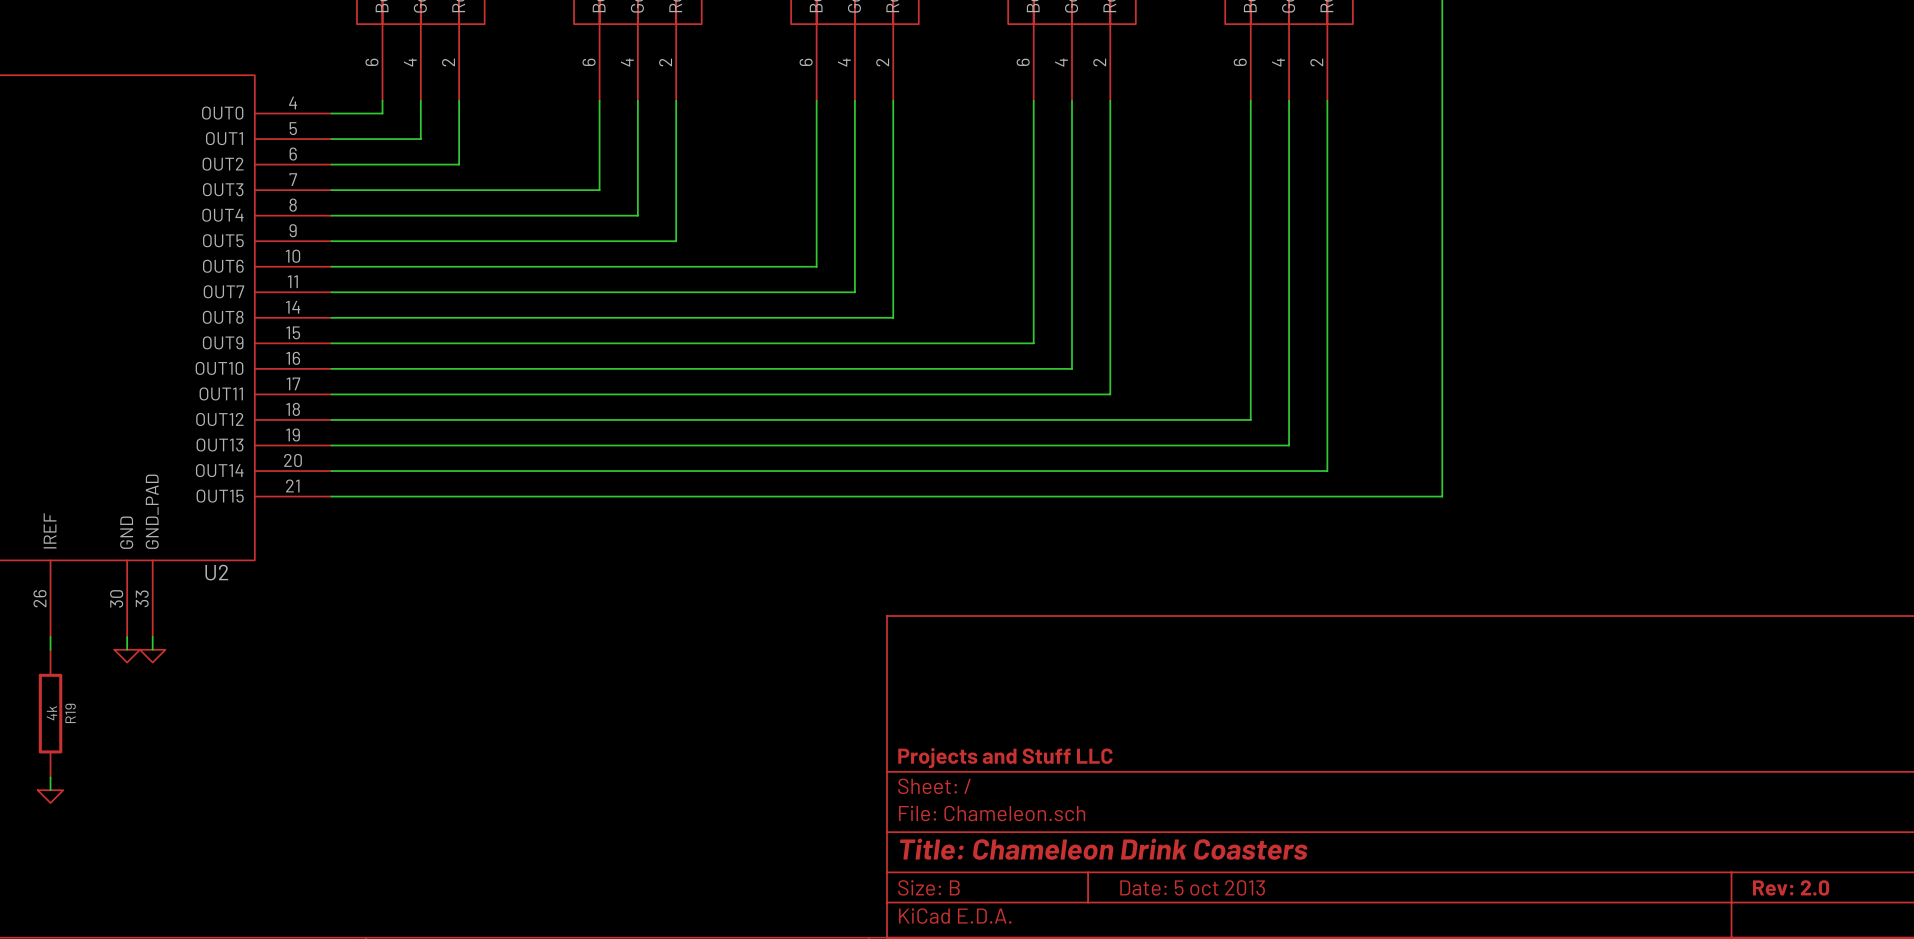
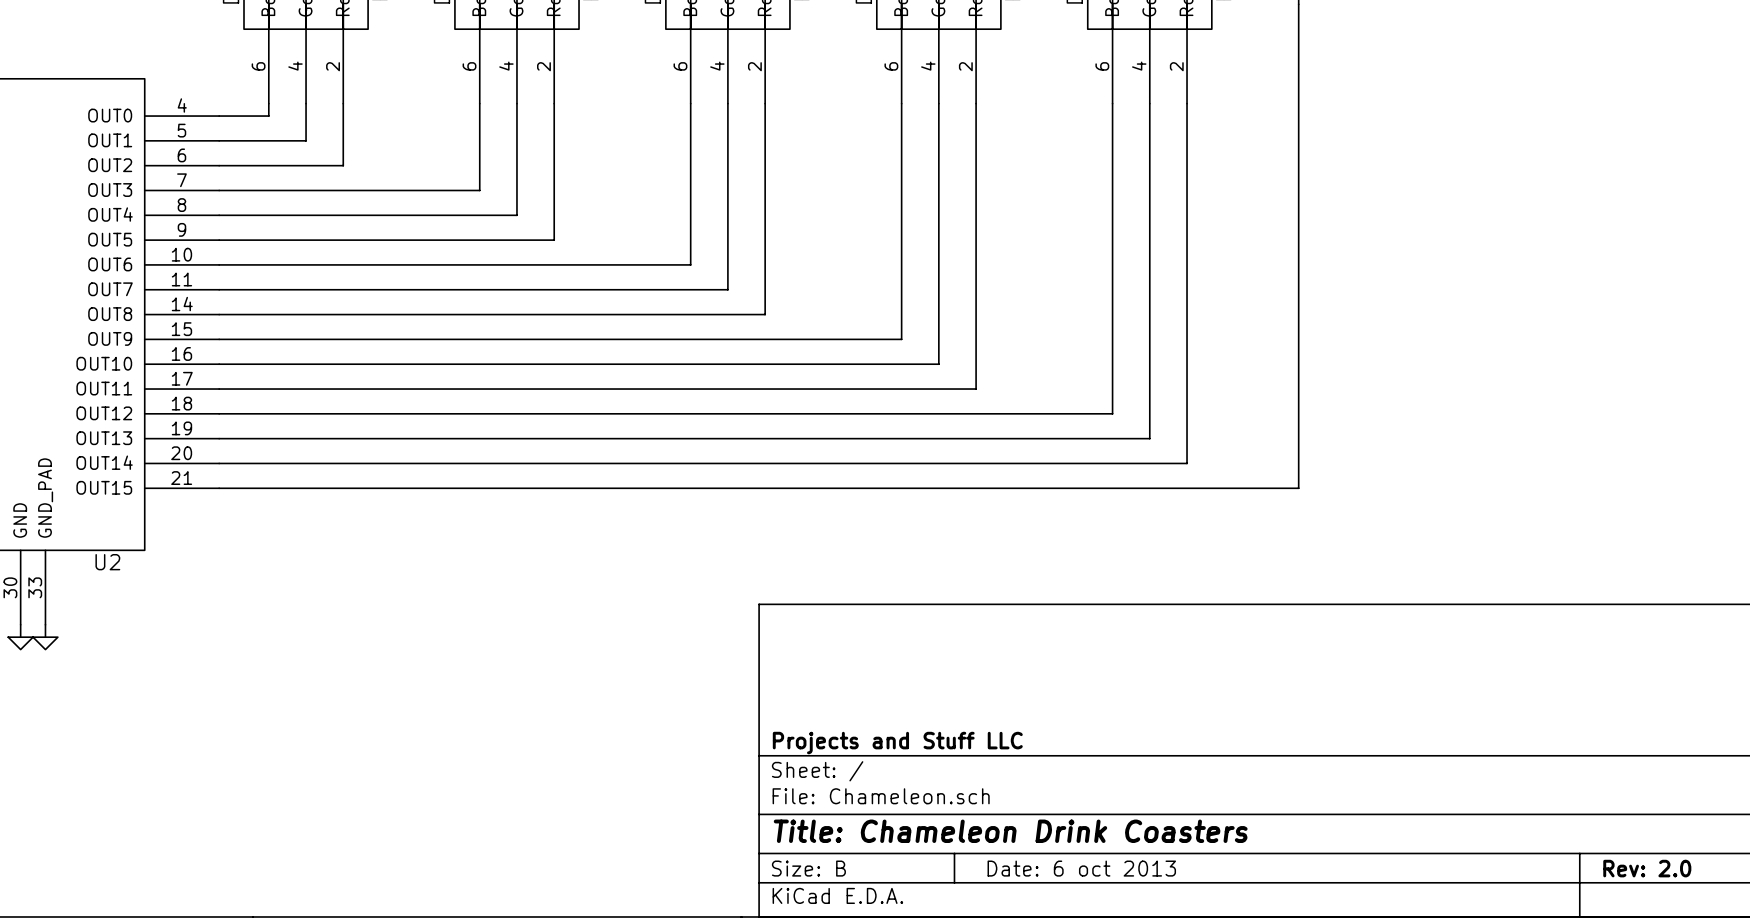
title block: Date: 5 oct 2013 (1192, 887) -> Date: 6 oct 2013 (1081, 868)

